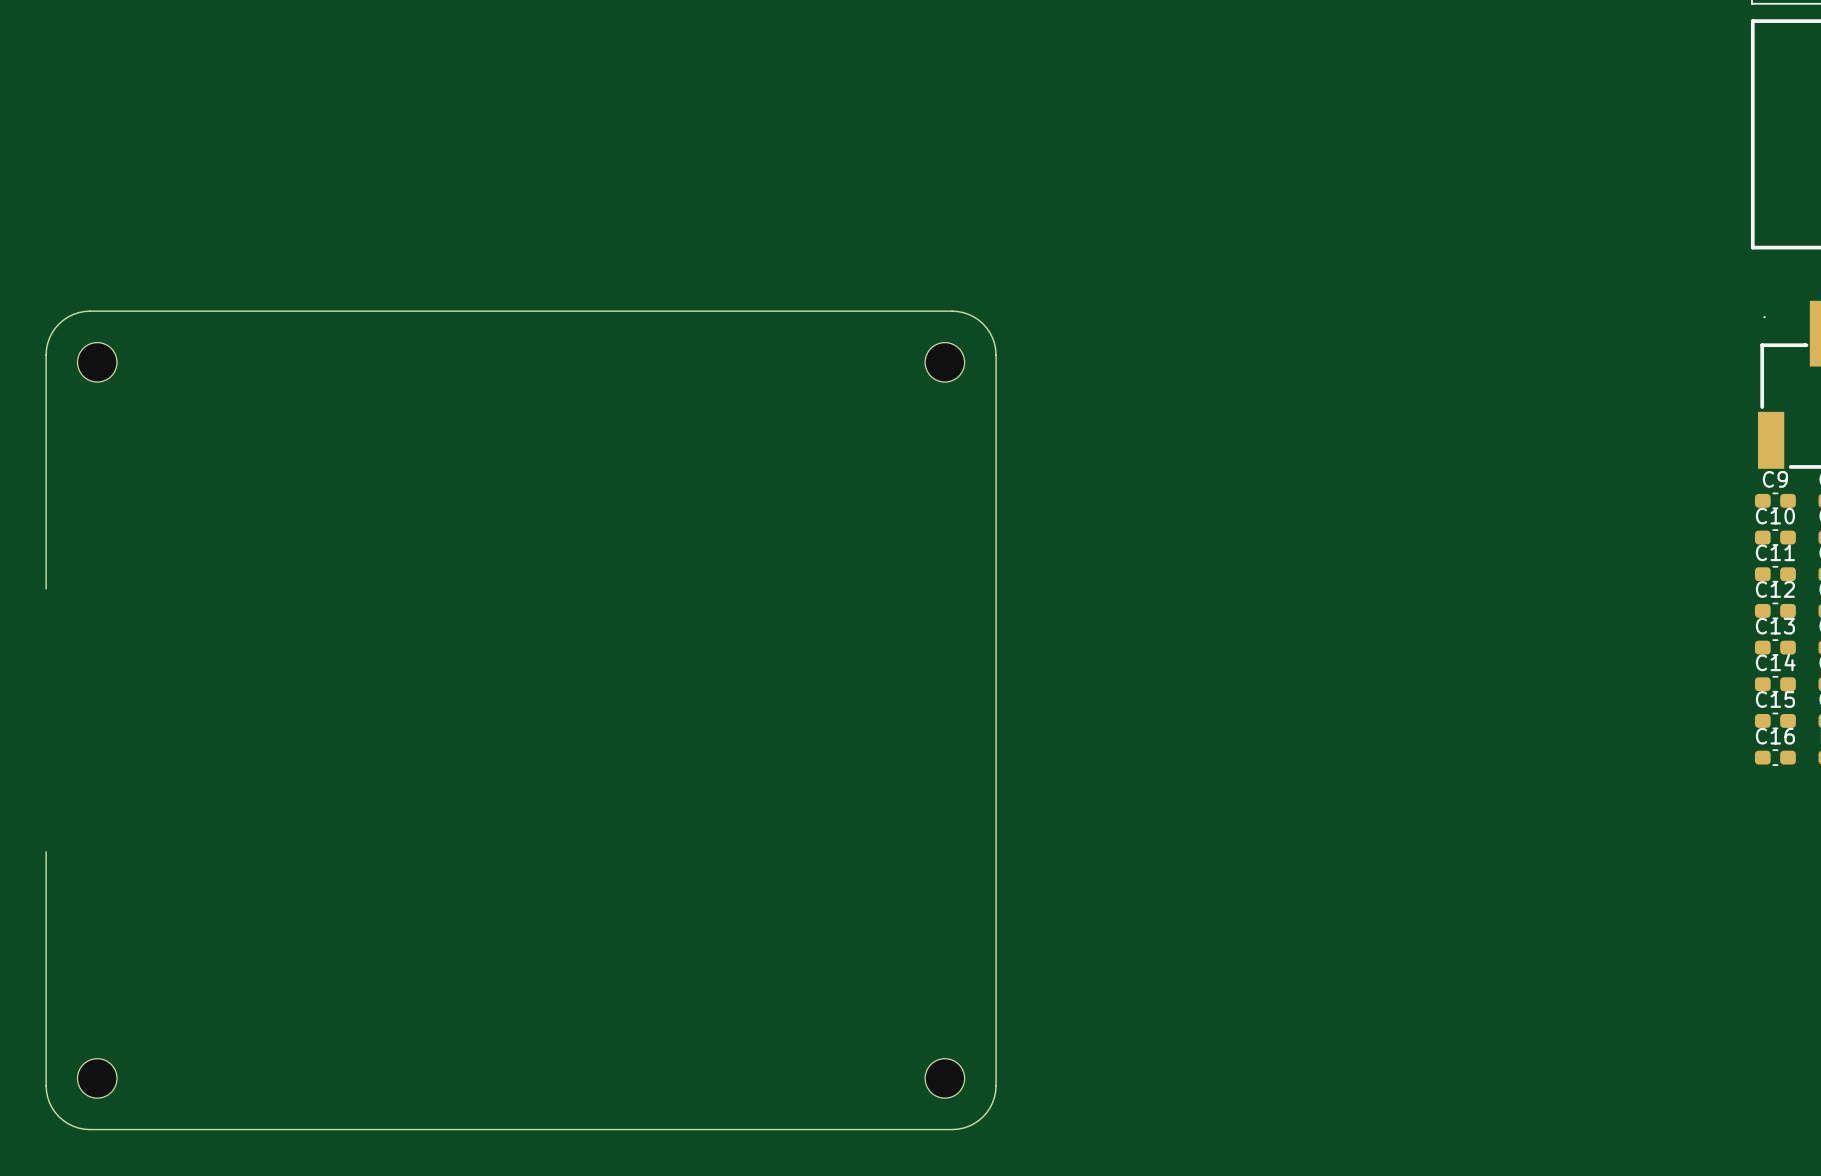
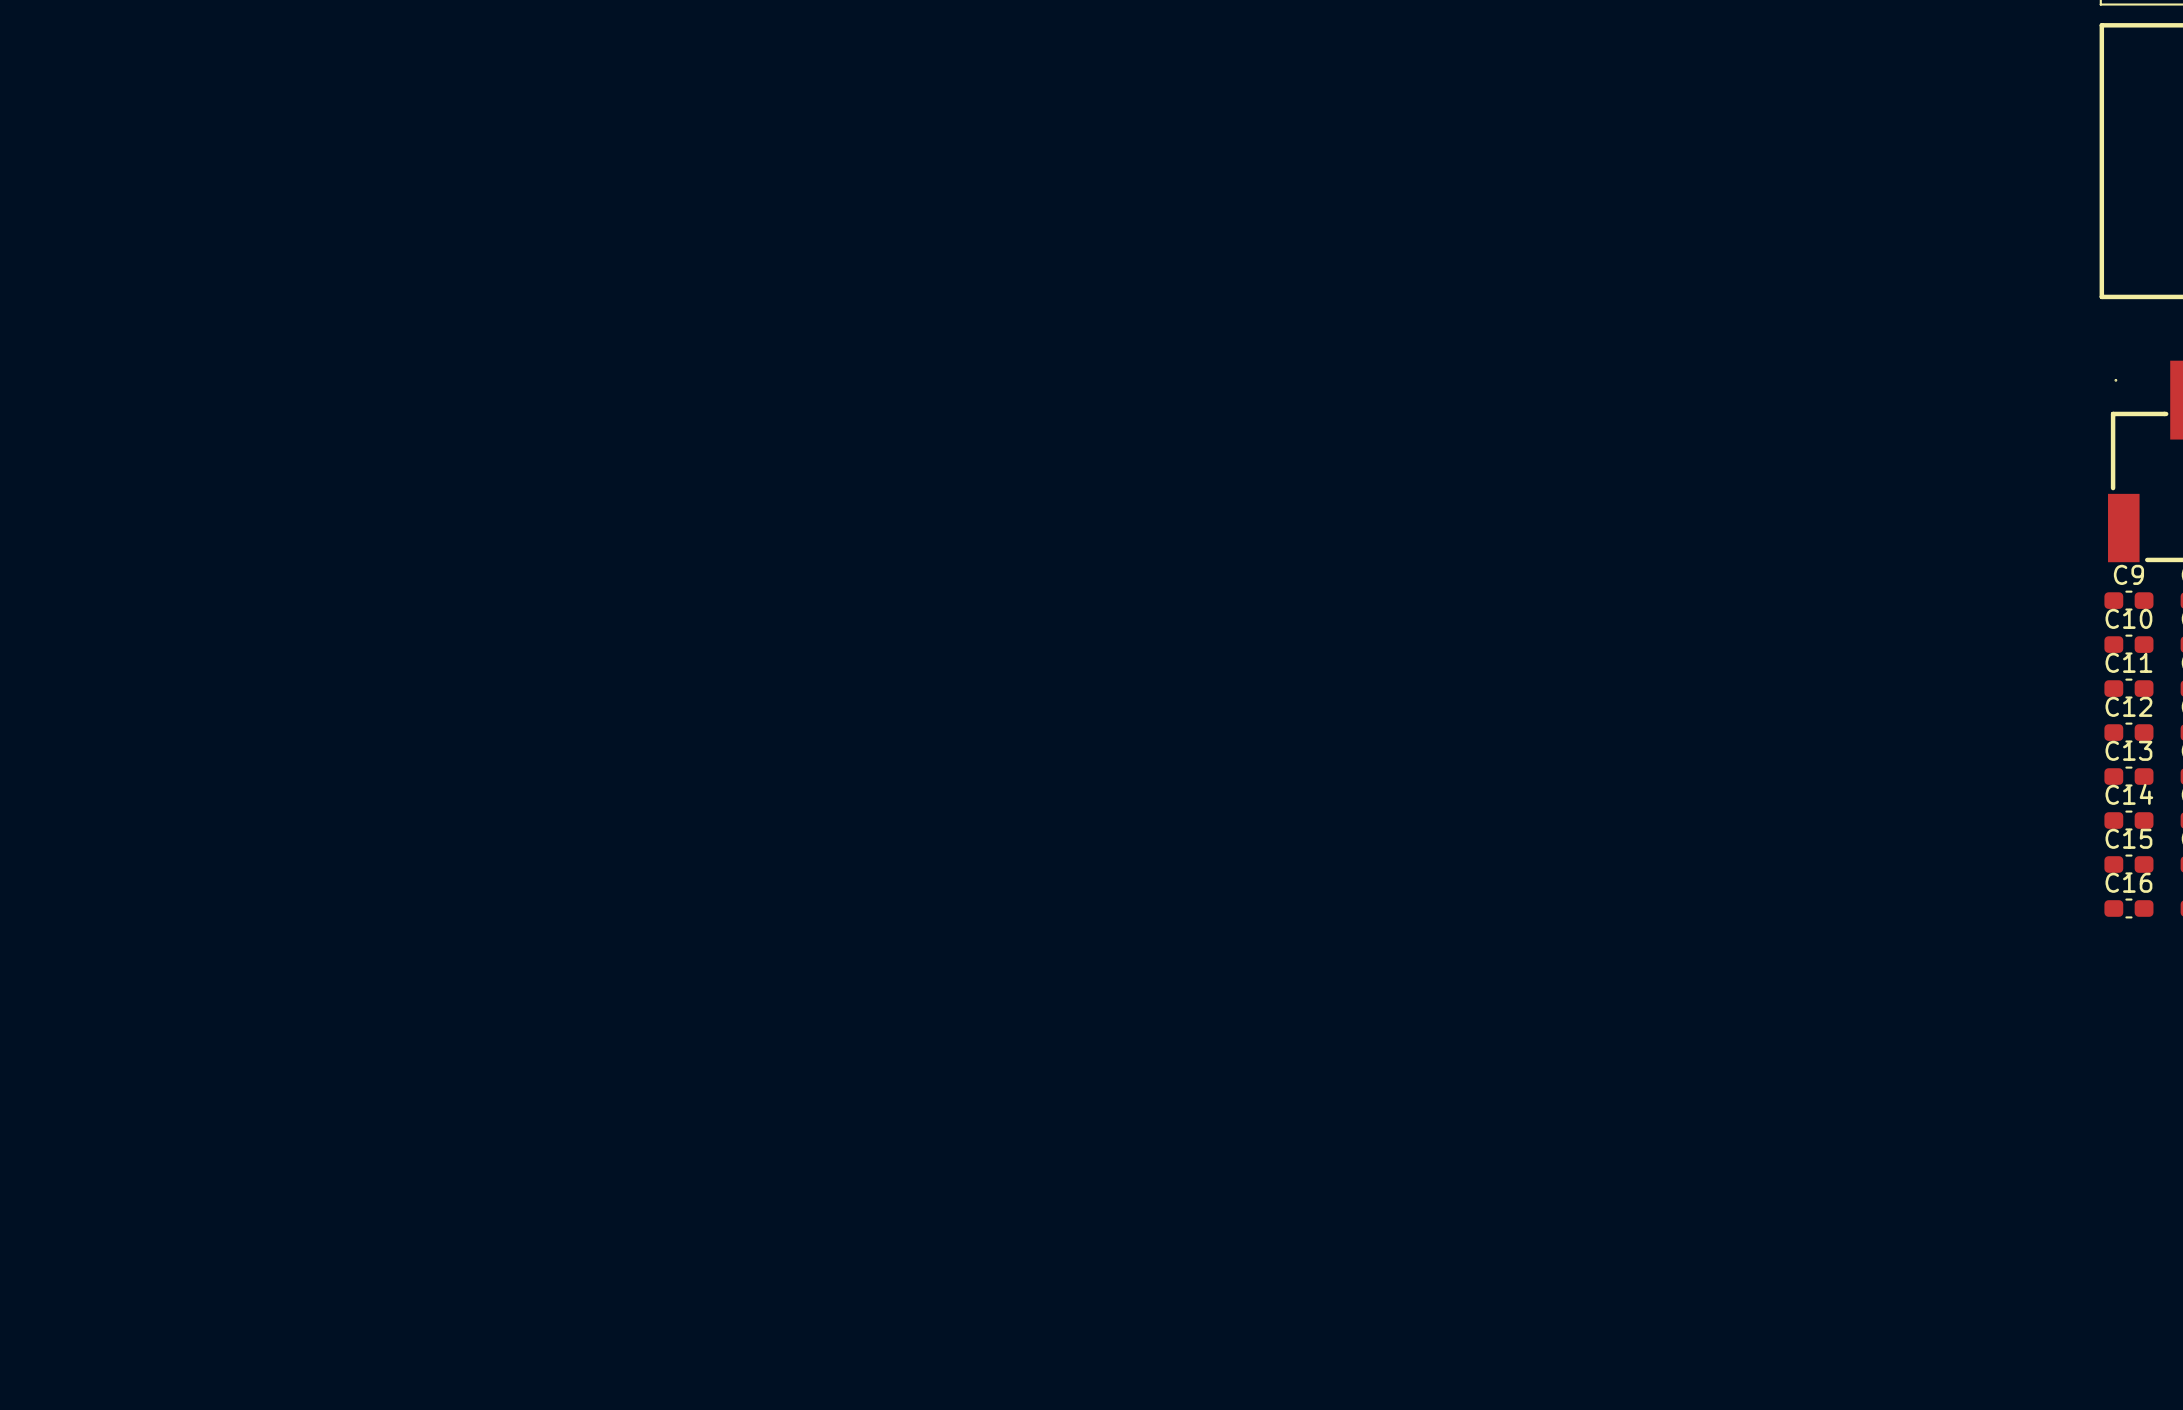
part: (97, 362) -> none
part: (944, 362) -> none
board edge: (46, 588) (46, 349) (55, 328) (63, 320) (78, 312) (952, 311) (963, 312) (978, 320) (986, 328) (994, 343) (996, 1085) (990, 1107) (974, 1123) (952, 1129) (78, 1128) (63, 1120) (55, 1112) (46, 1091) (46, 851) -> none
part: (97, 1078) -> none
part: (944, 1078) -> none

